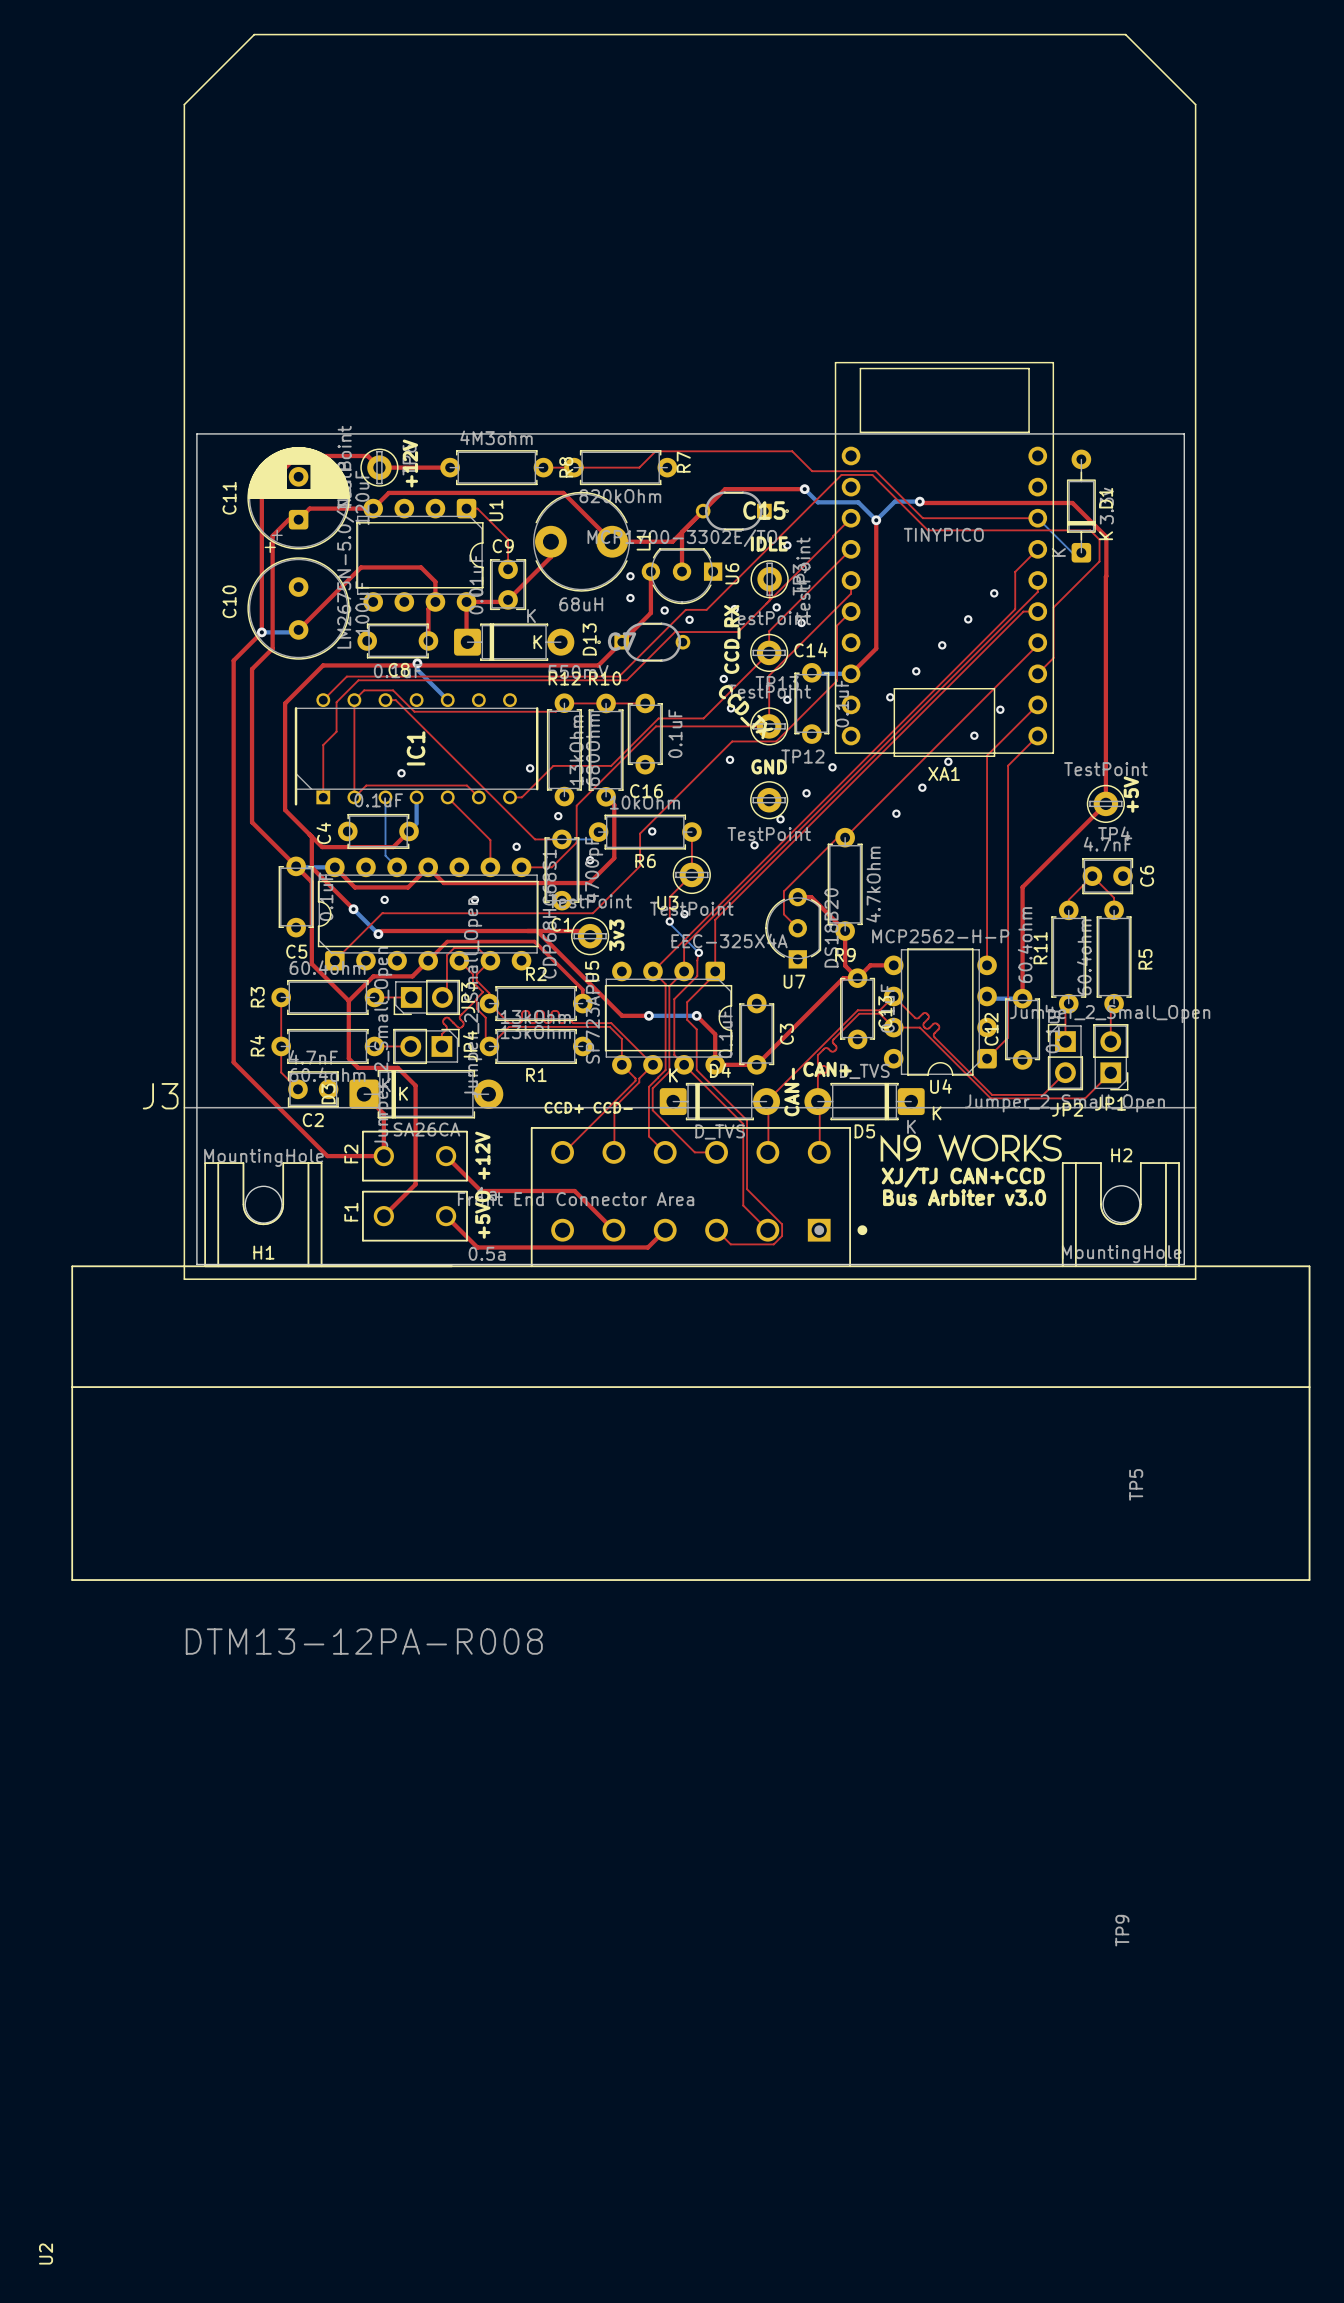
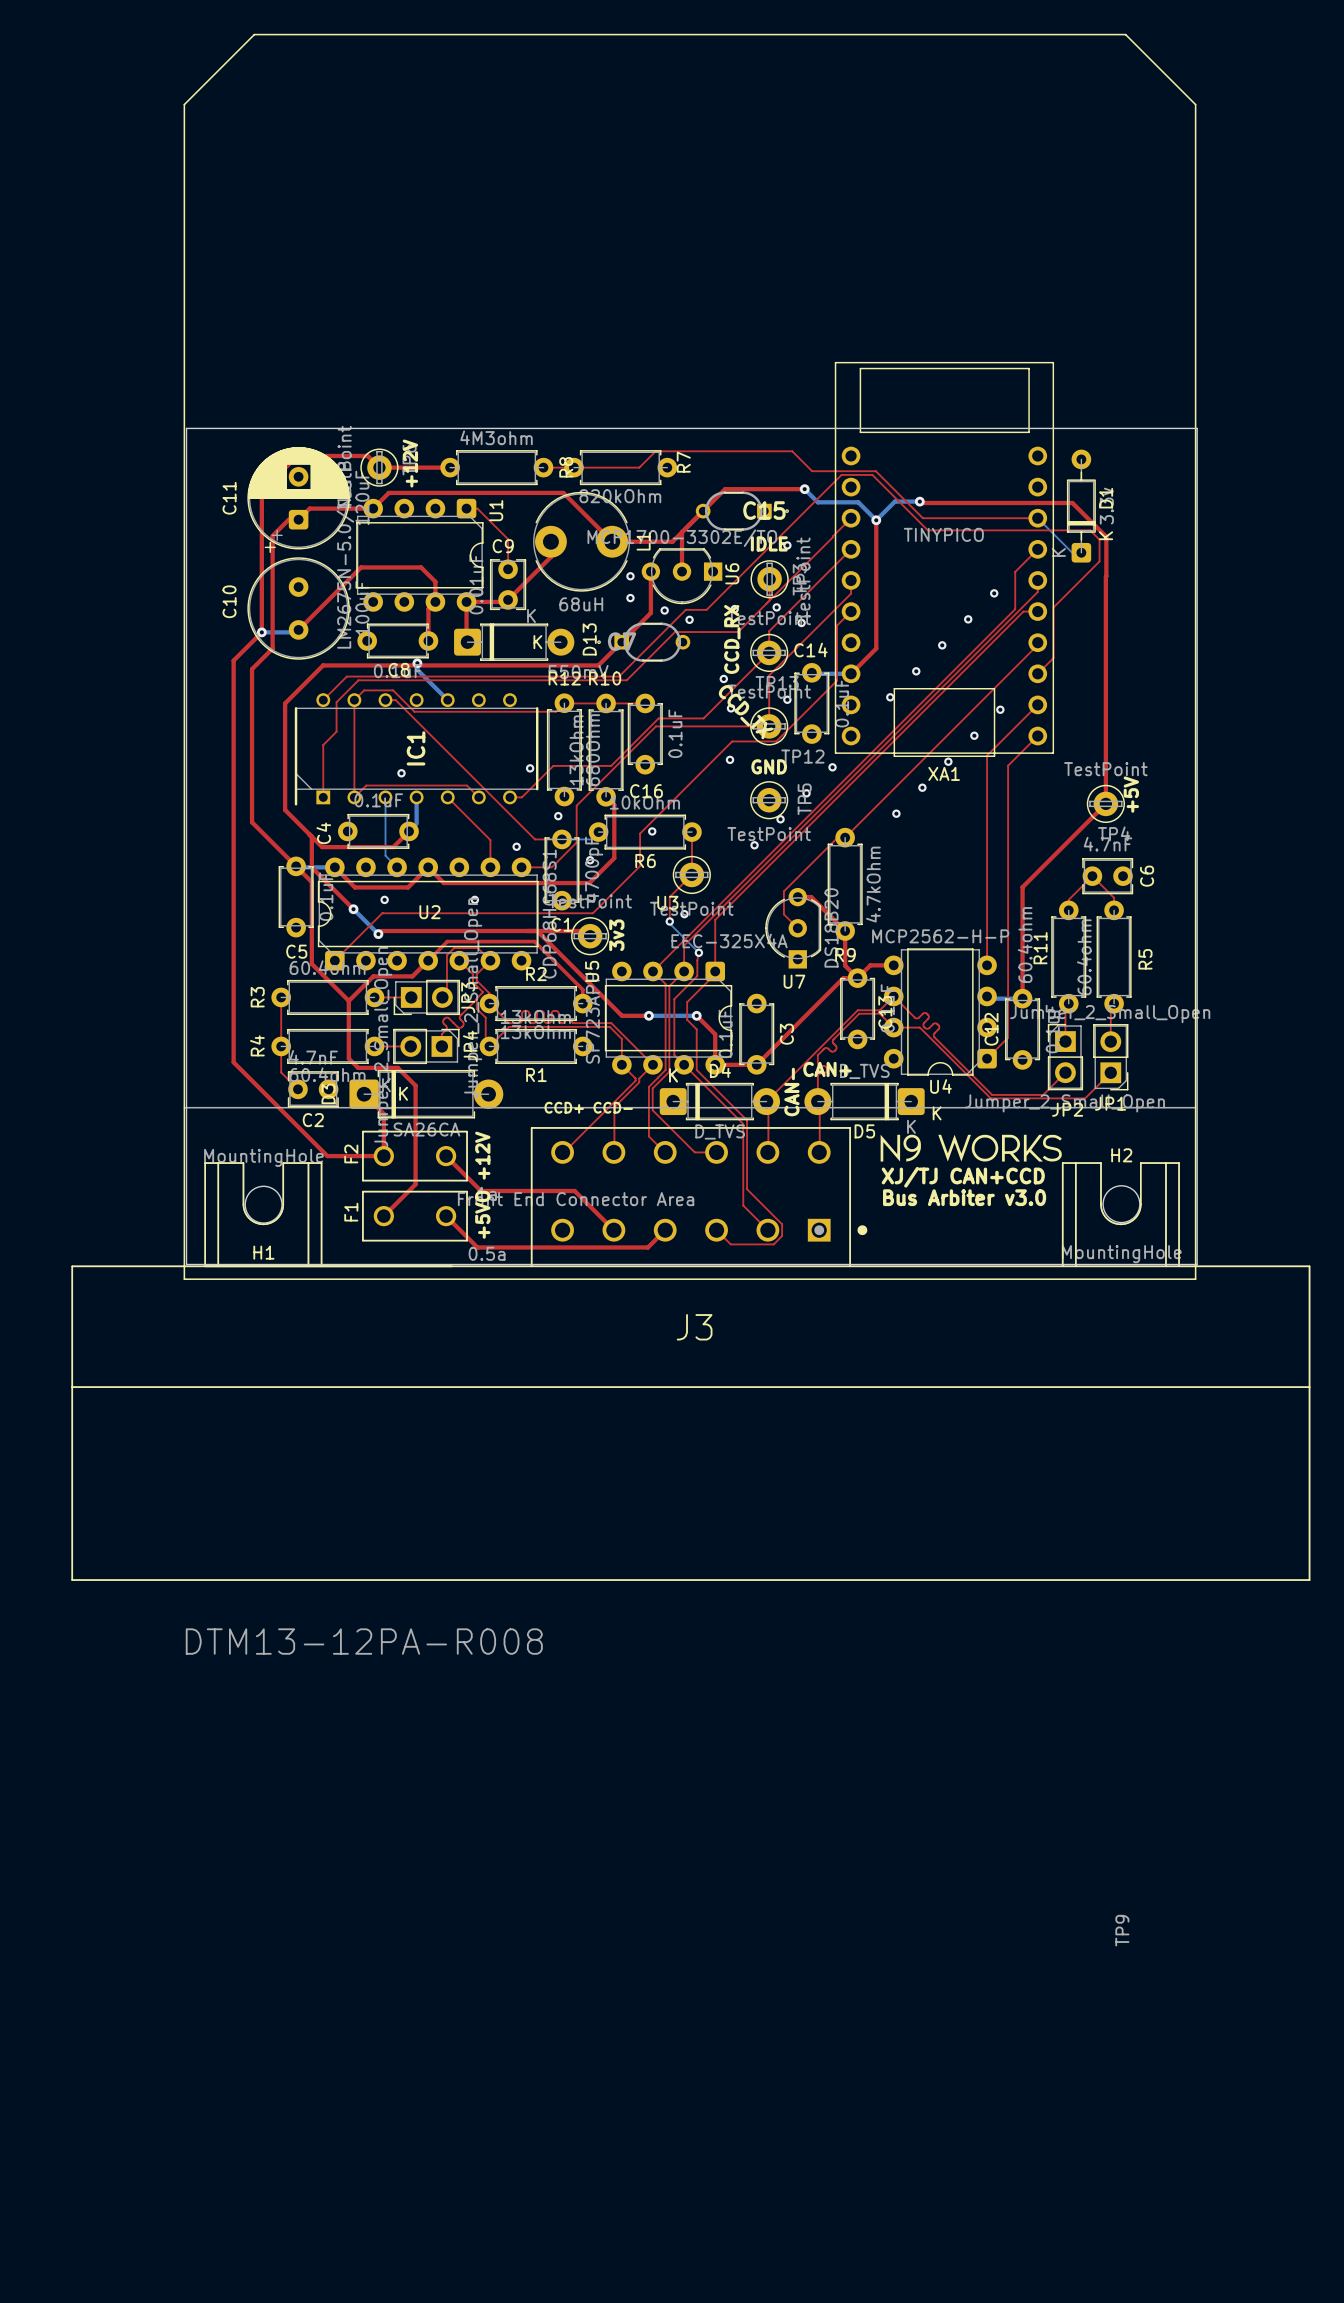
J3 name position: J3 (160, 1096) -> J3 (694, 1327)
board edge: (196, 1264) (196, 433) (1184, 433) (1184, 1264) -> (196, 1264) (186, 1264) (186, 428) (1197, 428) (1197, 1264) (1184, 1264)
TP5 name position: TP5 (1136, 1484) -> TP5 (804, 799)
U2 name rotation: 0° (46, 2254) -> 90° clockwise (429, 912)
U2 name position: U2 (46, 2254) -> U2 (429, 912)

